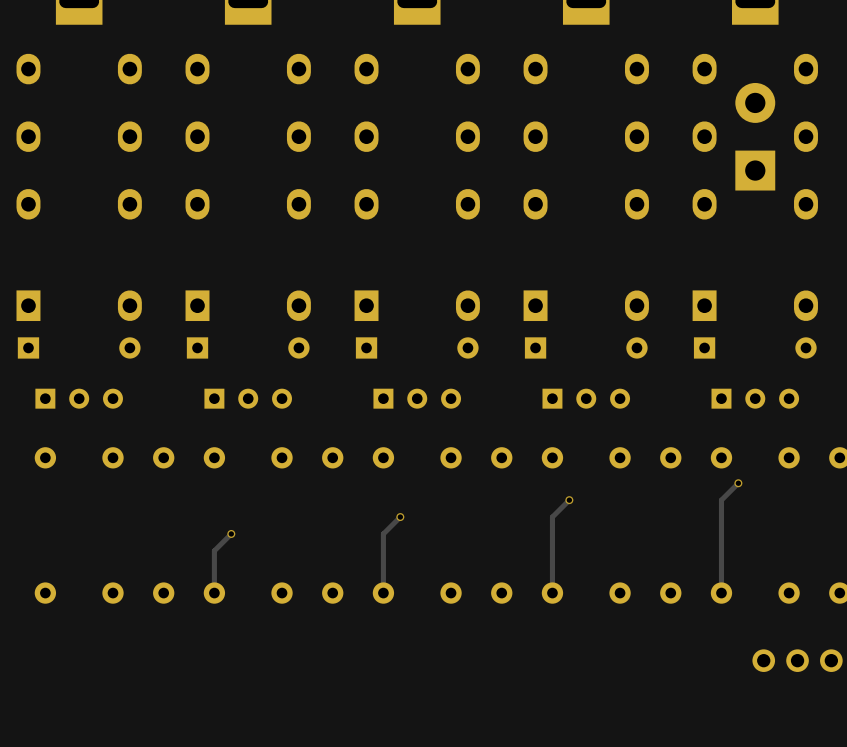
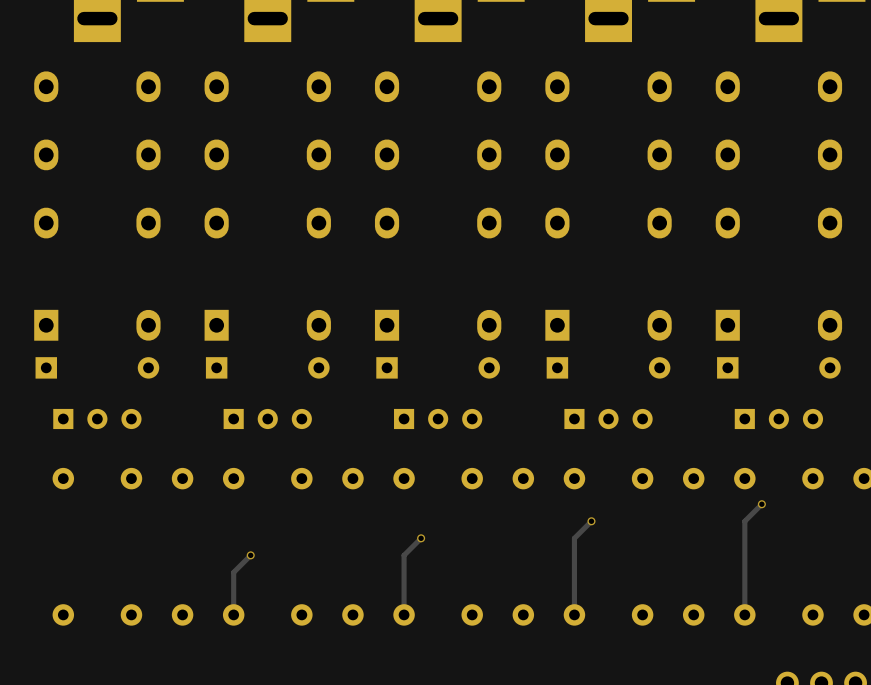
part: (755, 136) -> none

